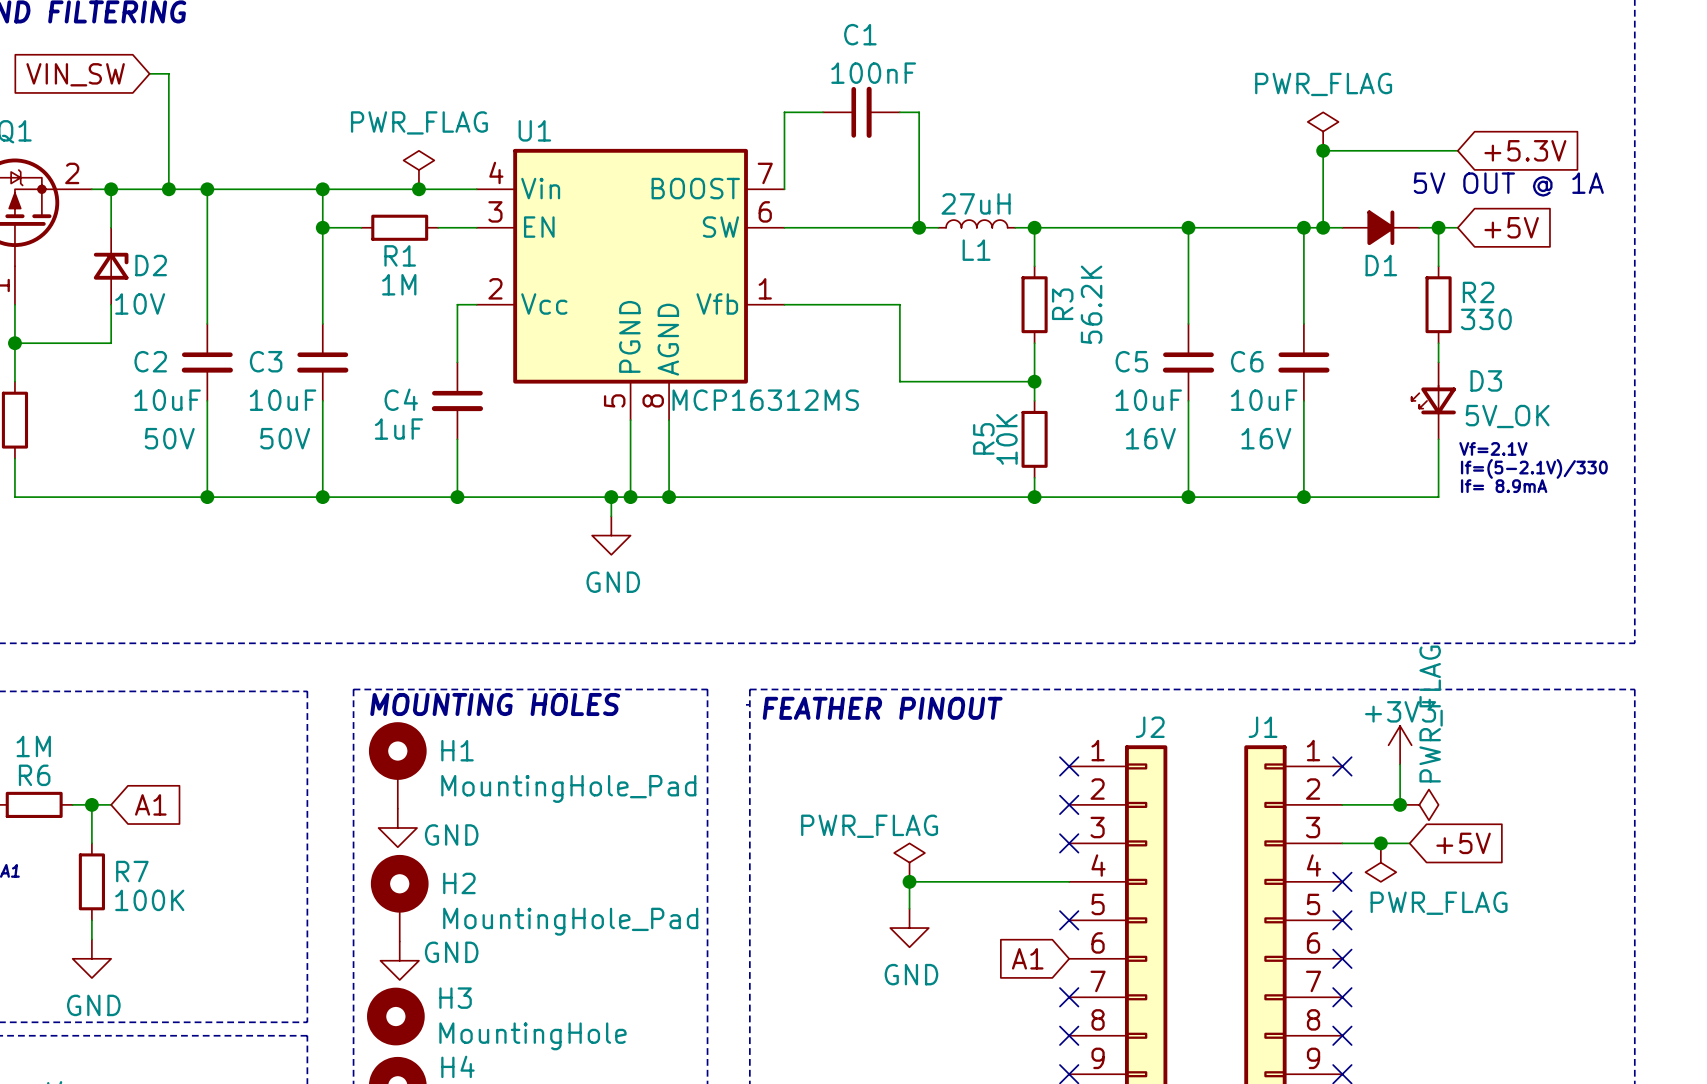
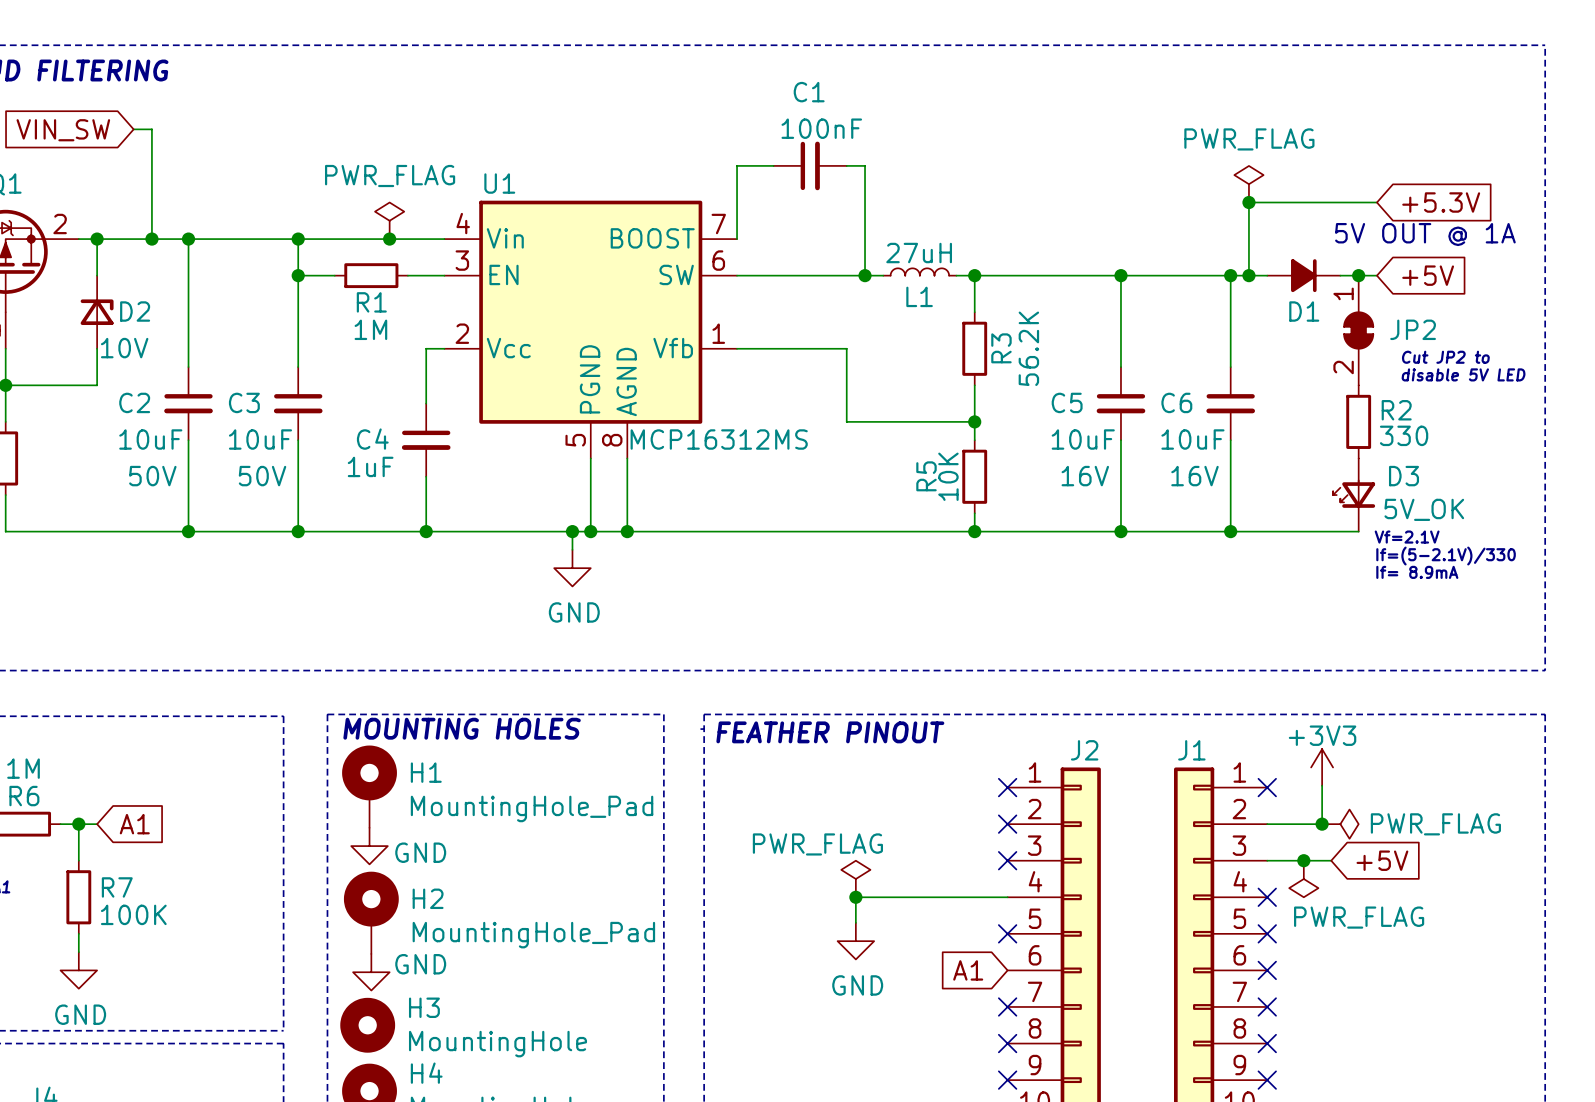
JP2: none -> (1358, 330)
R2 position: (1438, 304) -> (1358, 421)
text: none -> Cut JP2 to (1445, 357)
text: none -> disable 5V LED (1463, 374)
D3 position: (1433, 400) -> (1354, 495)
text position: Vf=2.1V (1493, 448) -> Vf=2.1V (1407, 537)
text position: If=(5-2.1V)/330 (1534, 468) -> If=(5-2.1V)/330 (1446, 556)
text position: If= 8.9mA (1504, 486) -> If= 8.9mA (1417, 572)
power symbol text rotation: 0° (1431, 714) -> 90° clockwise (1435, 824)

